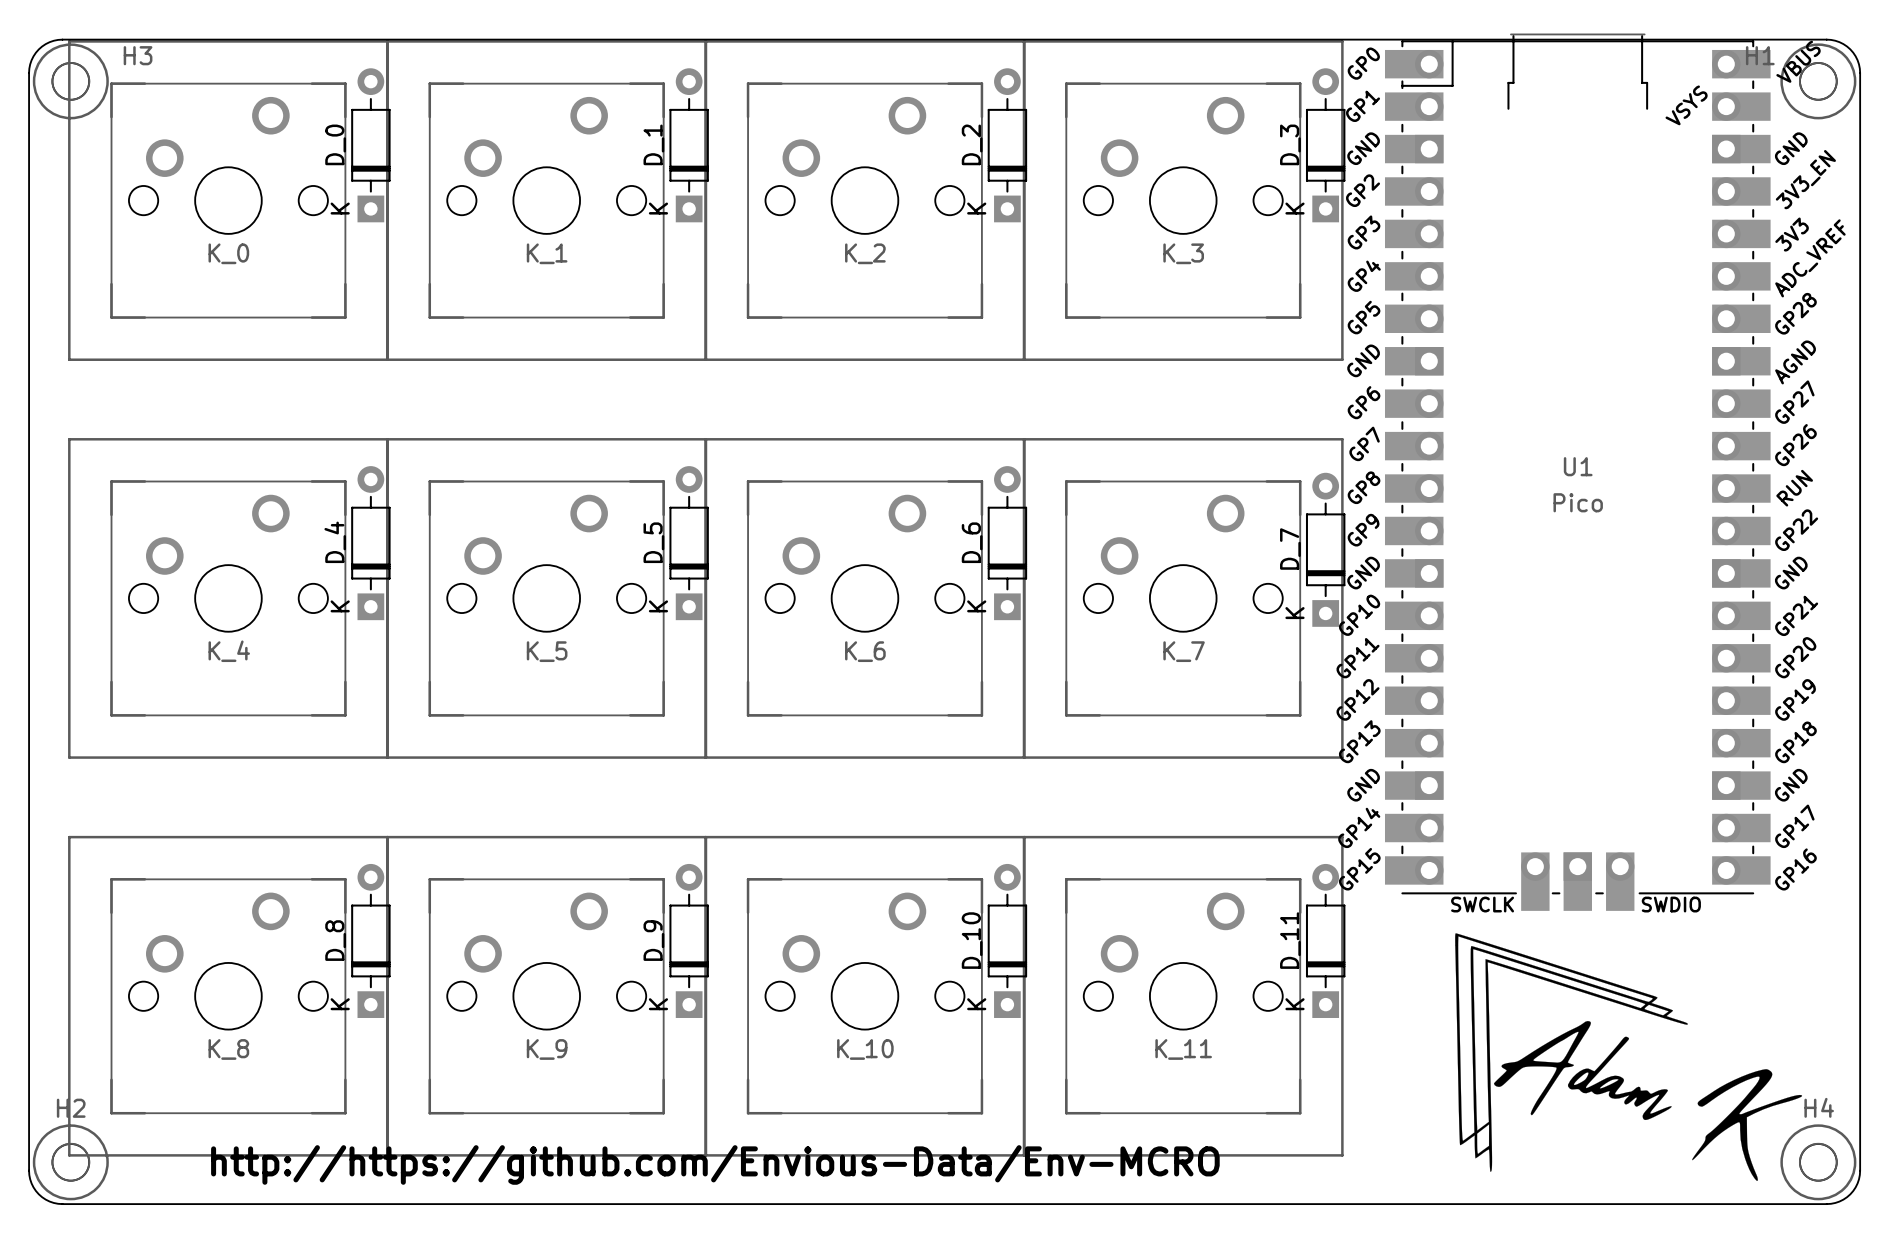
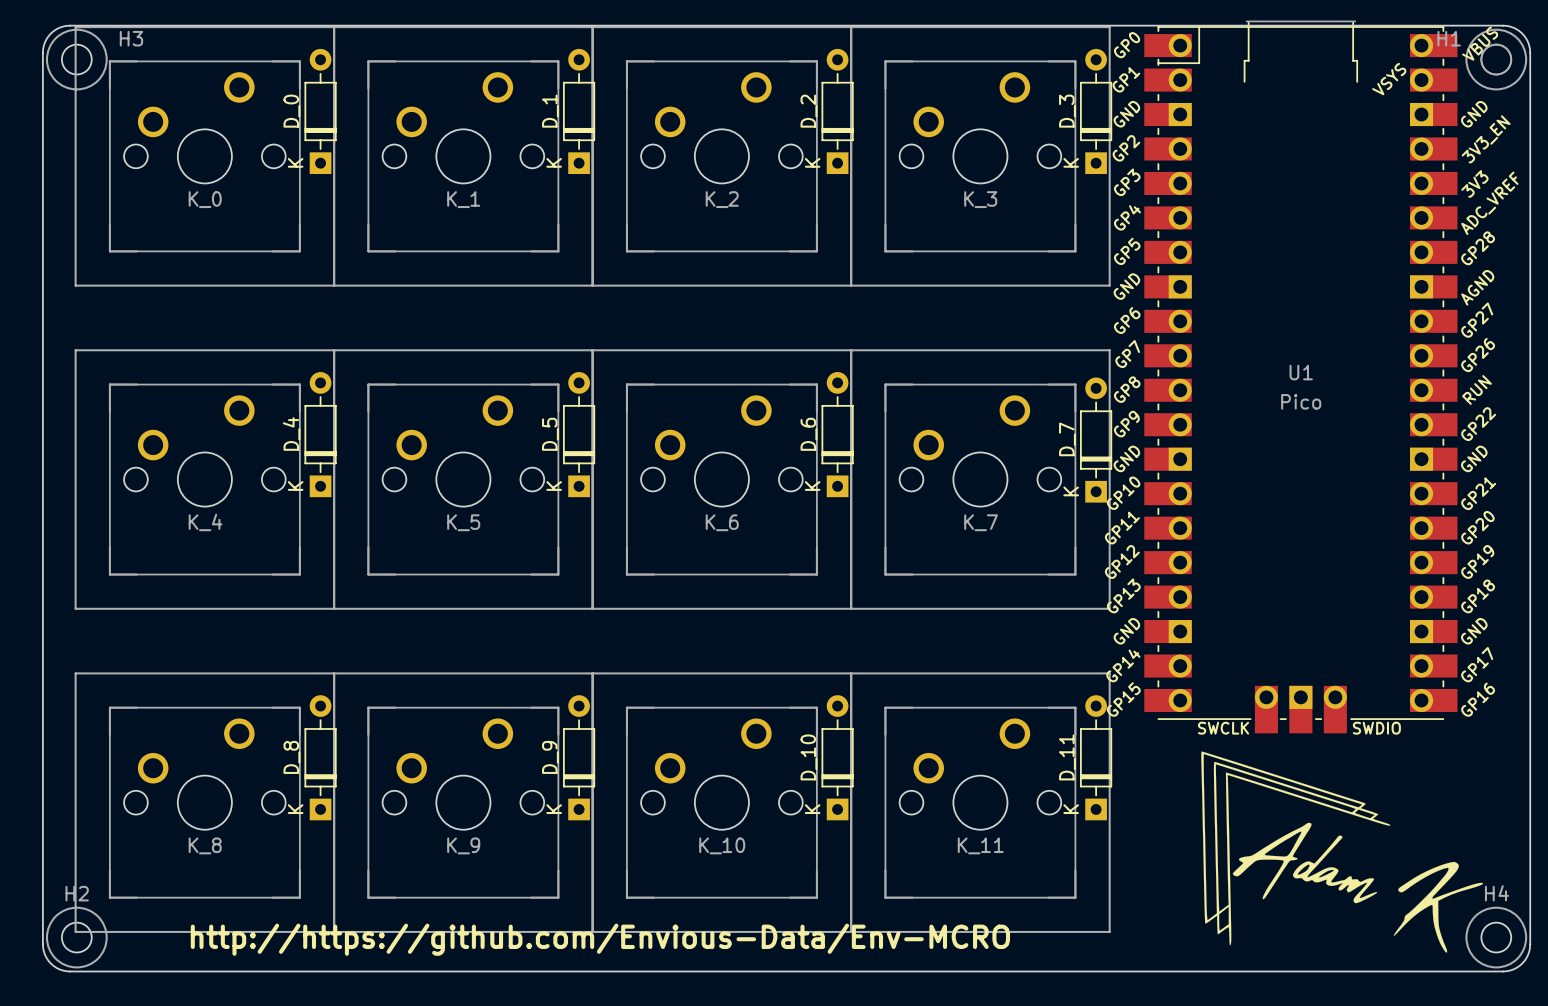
drawing: [51, 62, 91, 101] -> none
drawing: [51, 1142, 91, 1182] -> none
drawing: [1799, 1142, 1838, 1182] -> none

